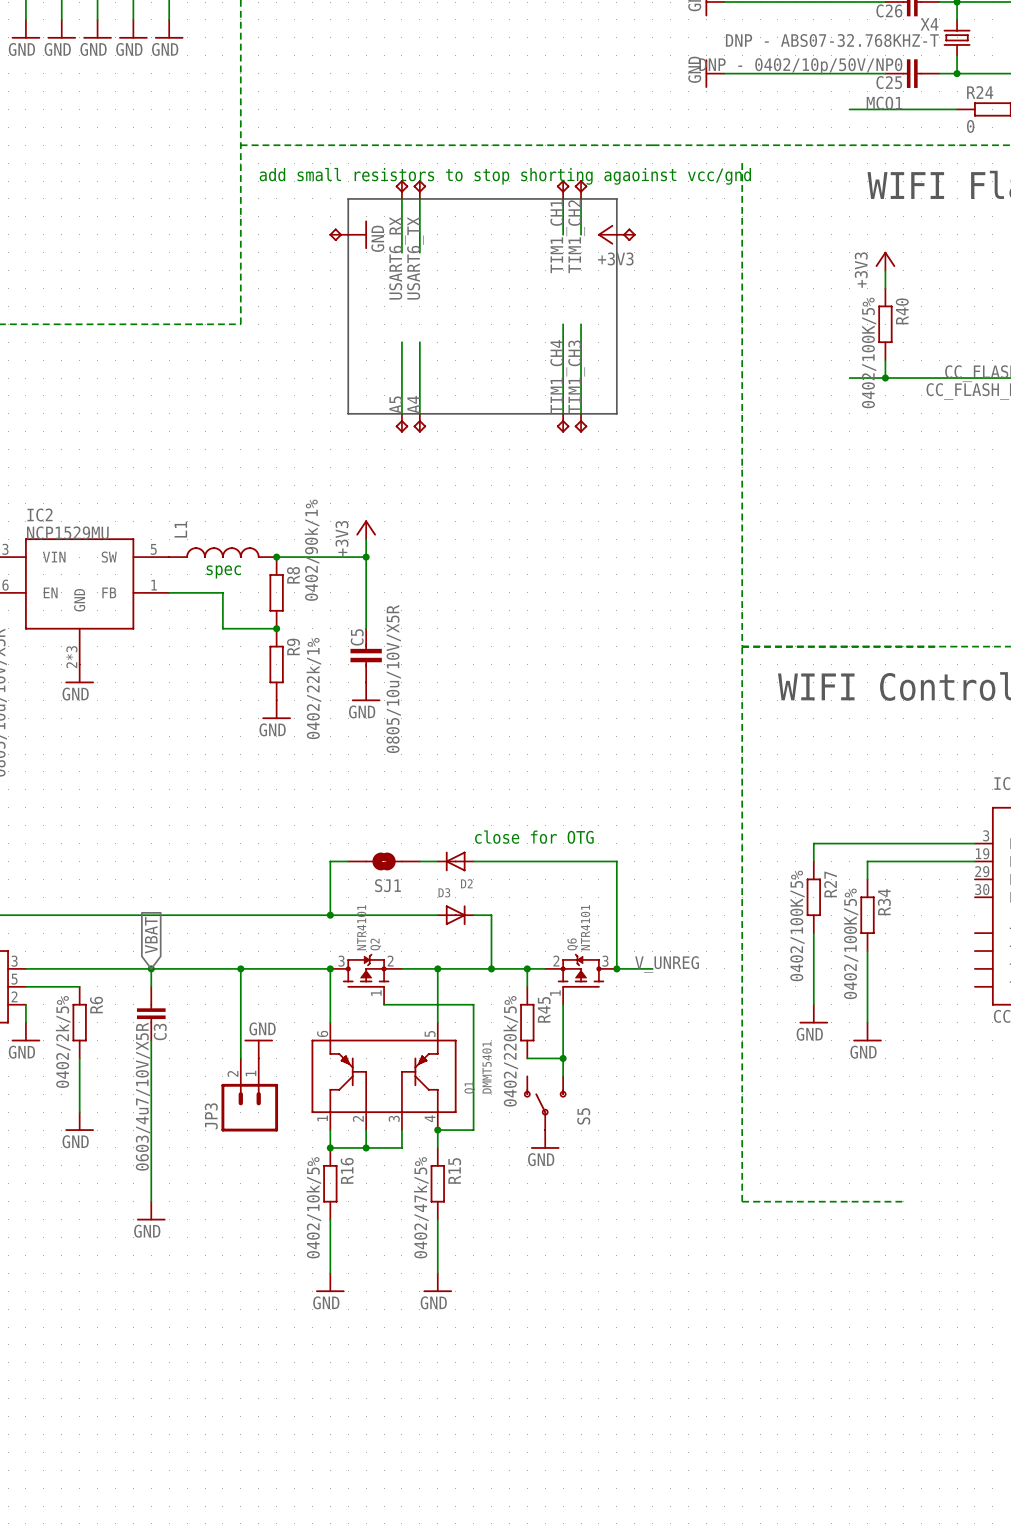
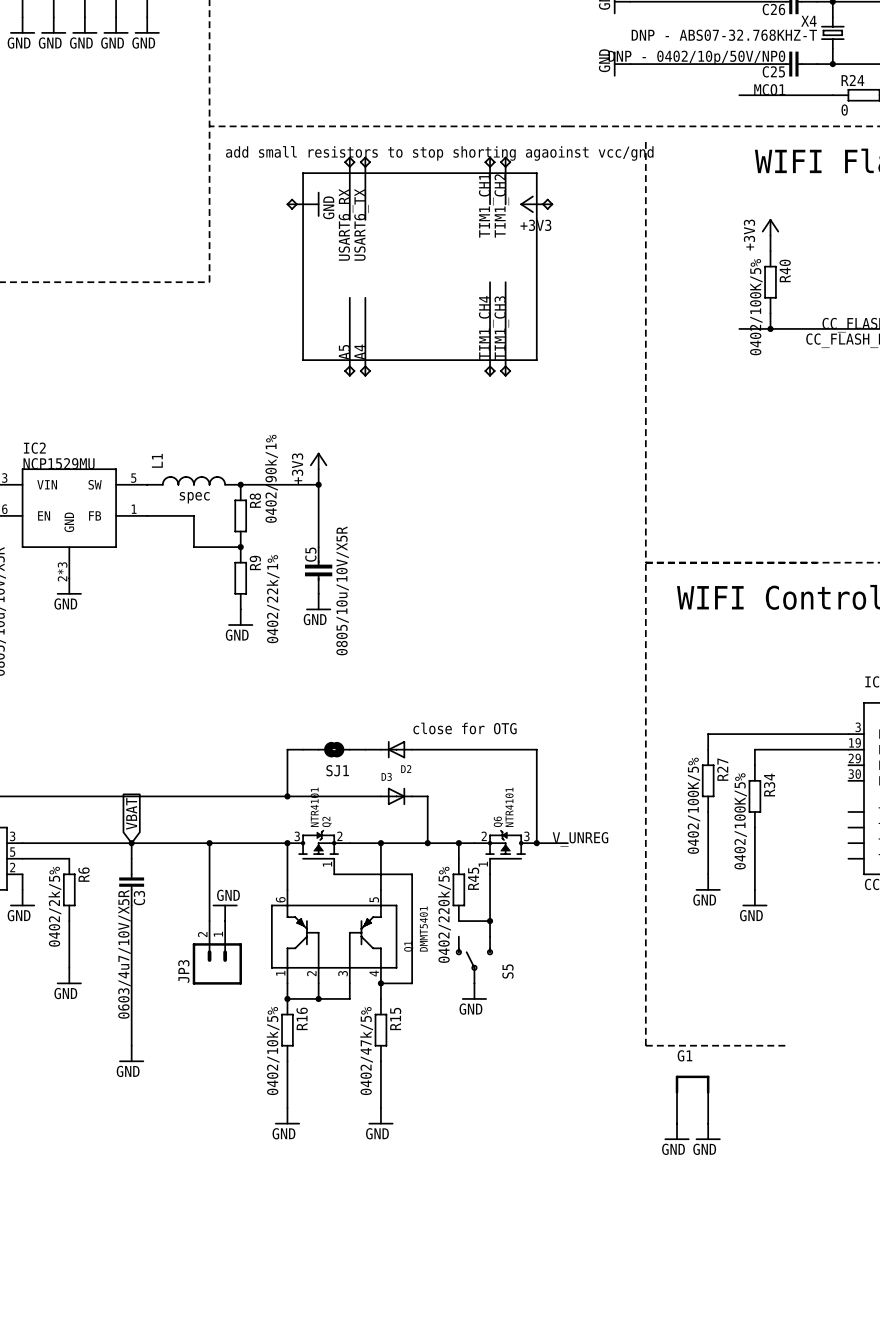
G1: none -> (692, 1099)
power symbol: none -> GND (677, 1131)
power symbol: none -> GND (708, 1131)

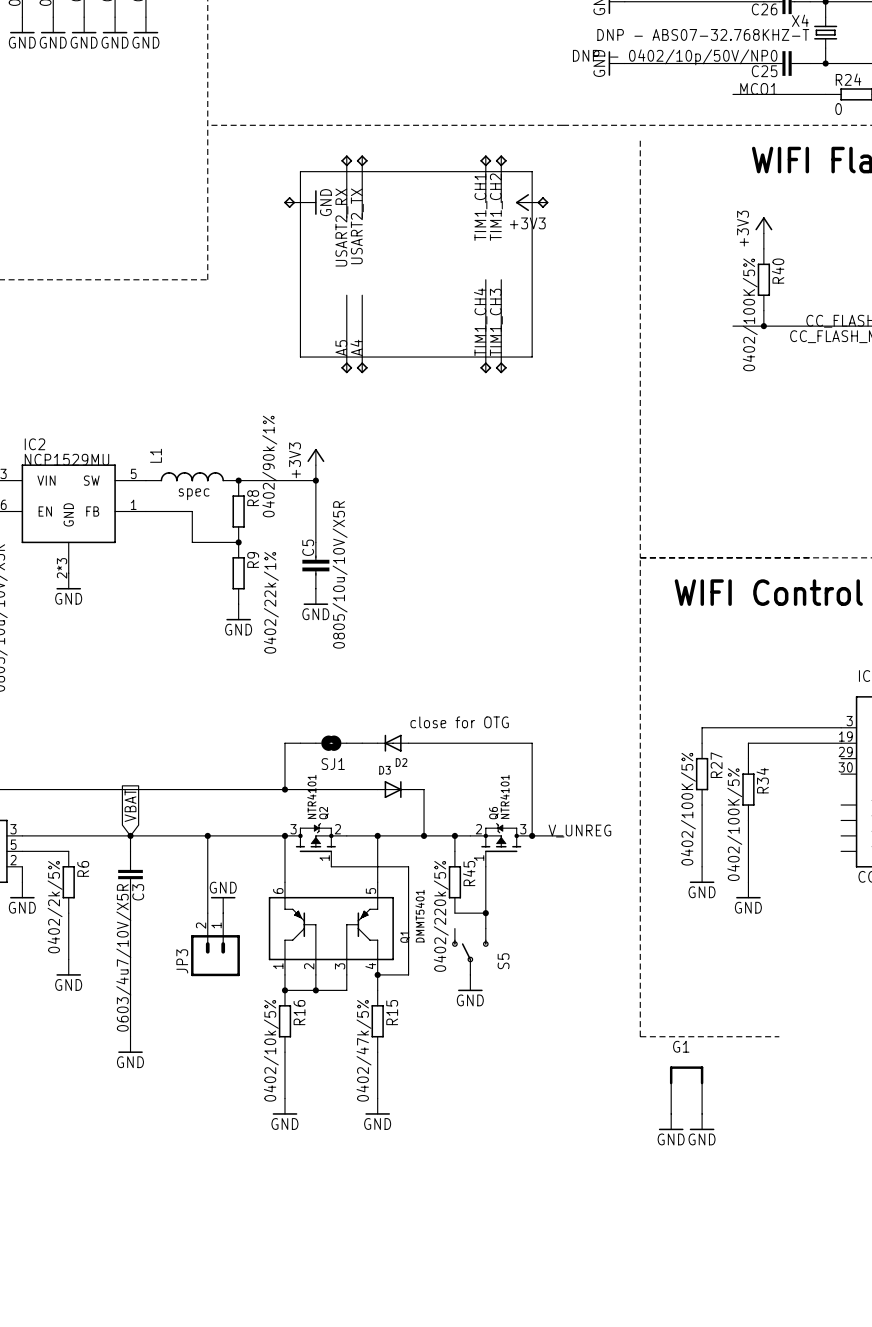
text: add small resistors to stop shorting agaoinst vcc/gnd (439, 153) -> none
label: USART6_RX (346, 224) -> USART2_RX (341, 227)
label: USART6_TX (361, 224) -> USART2_TX (357, 226)

